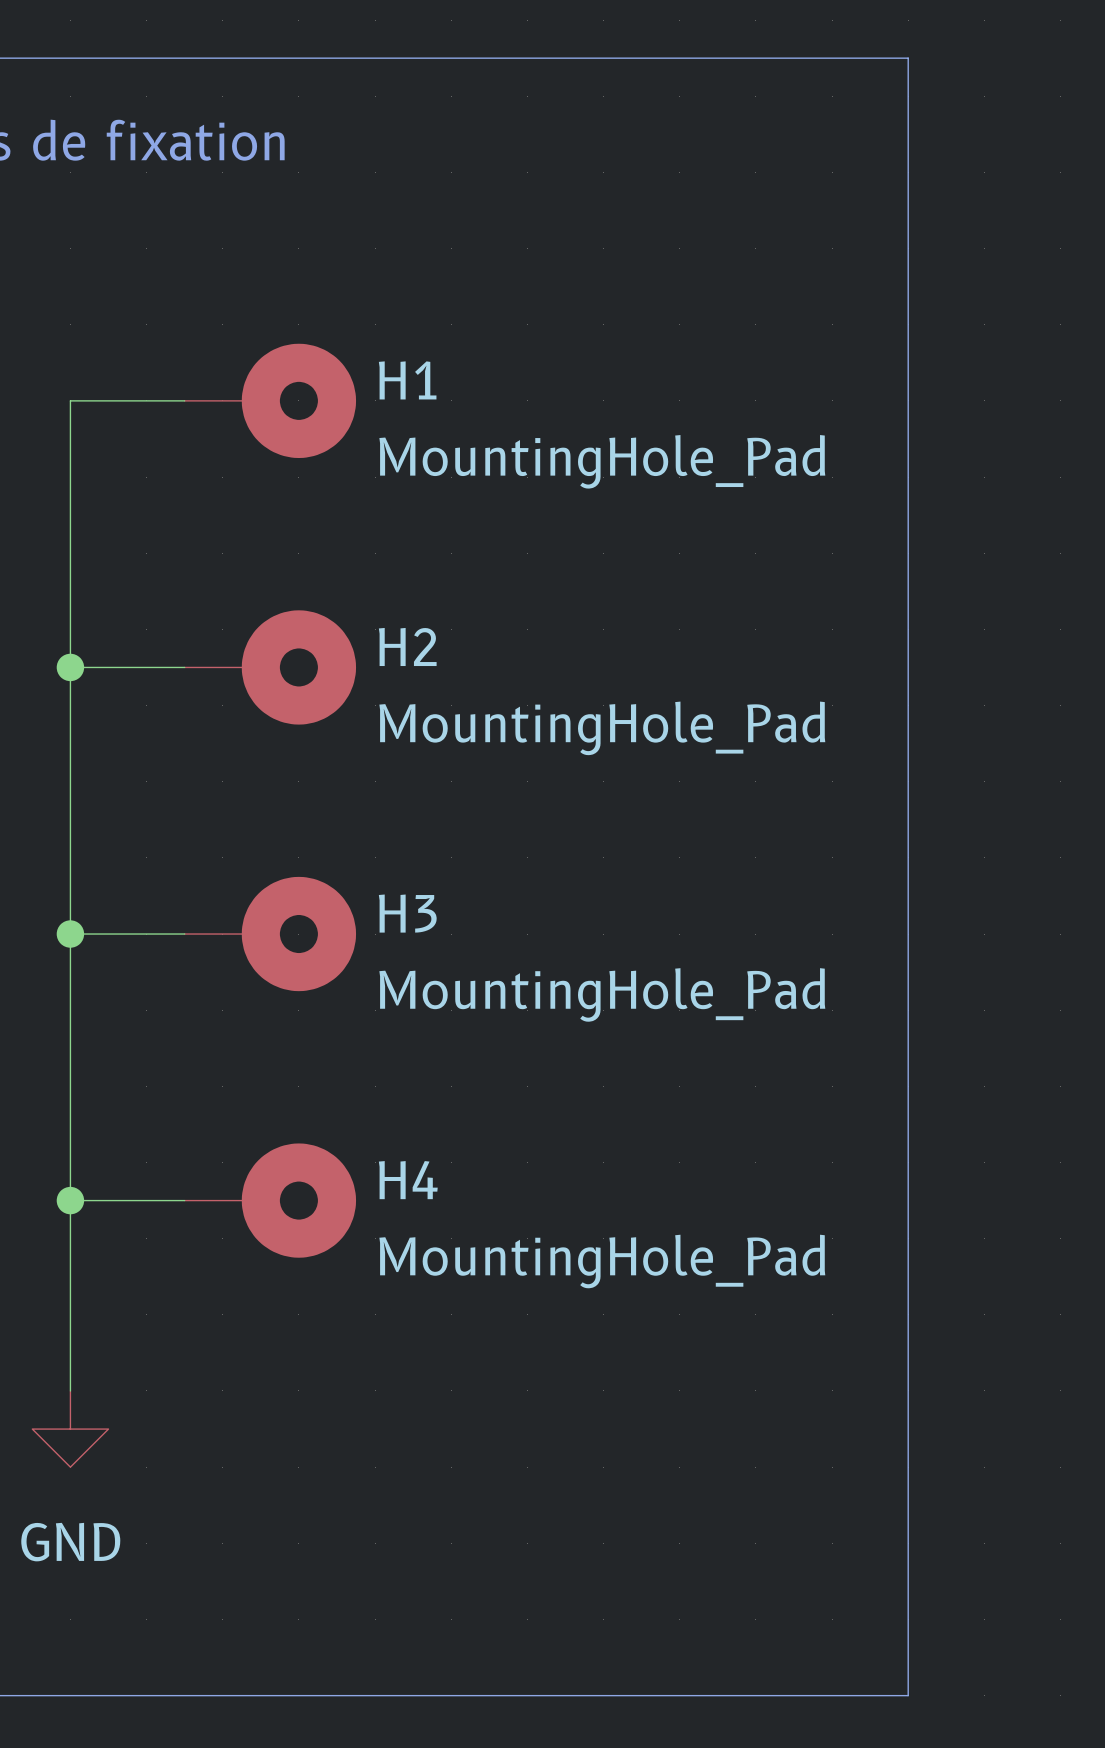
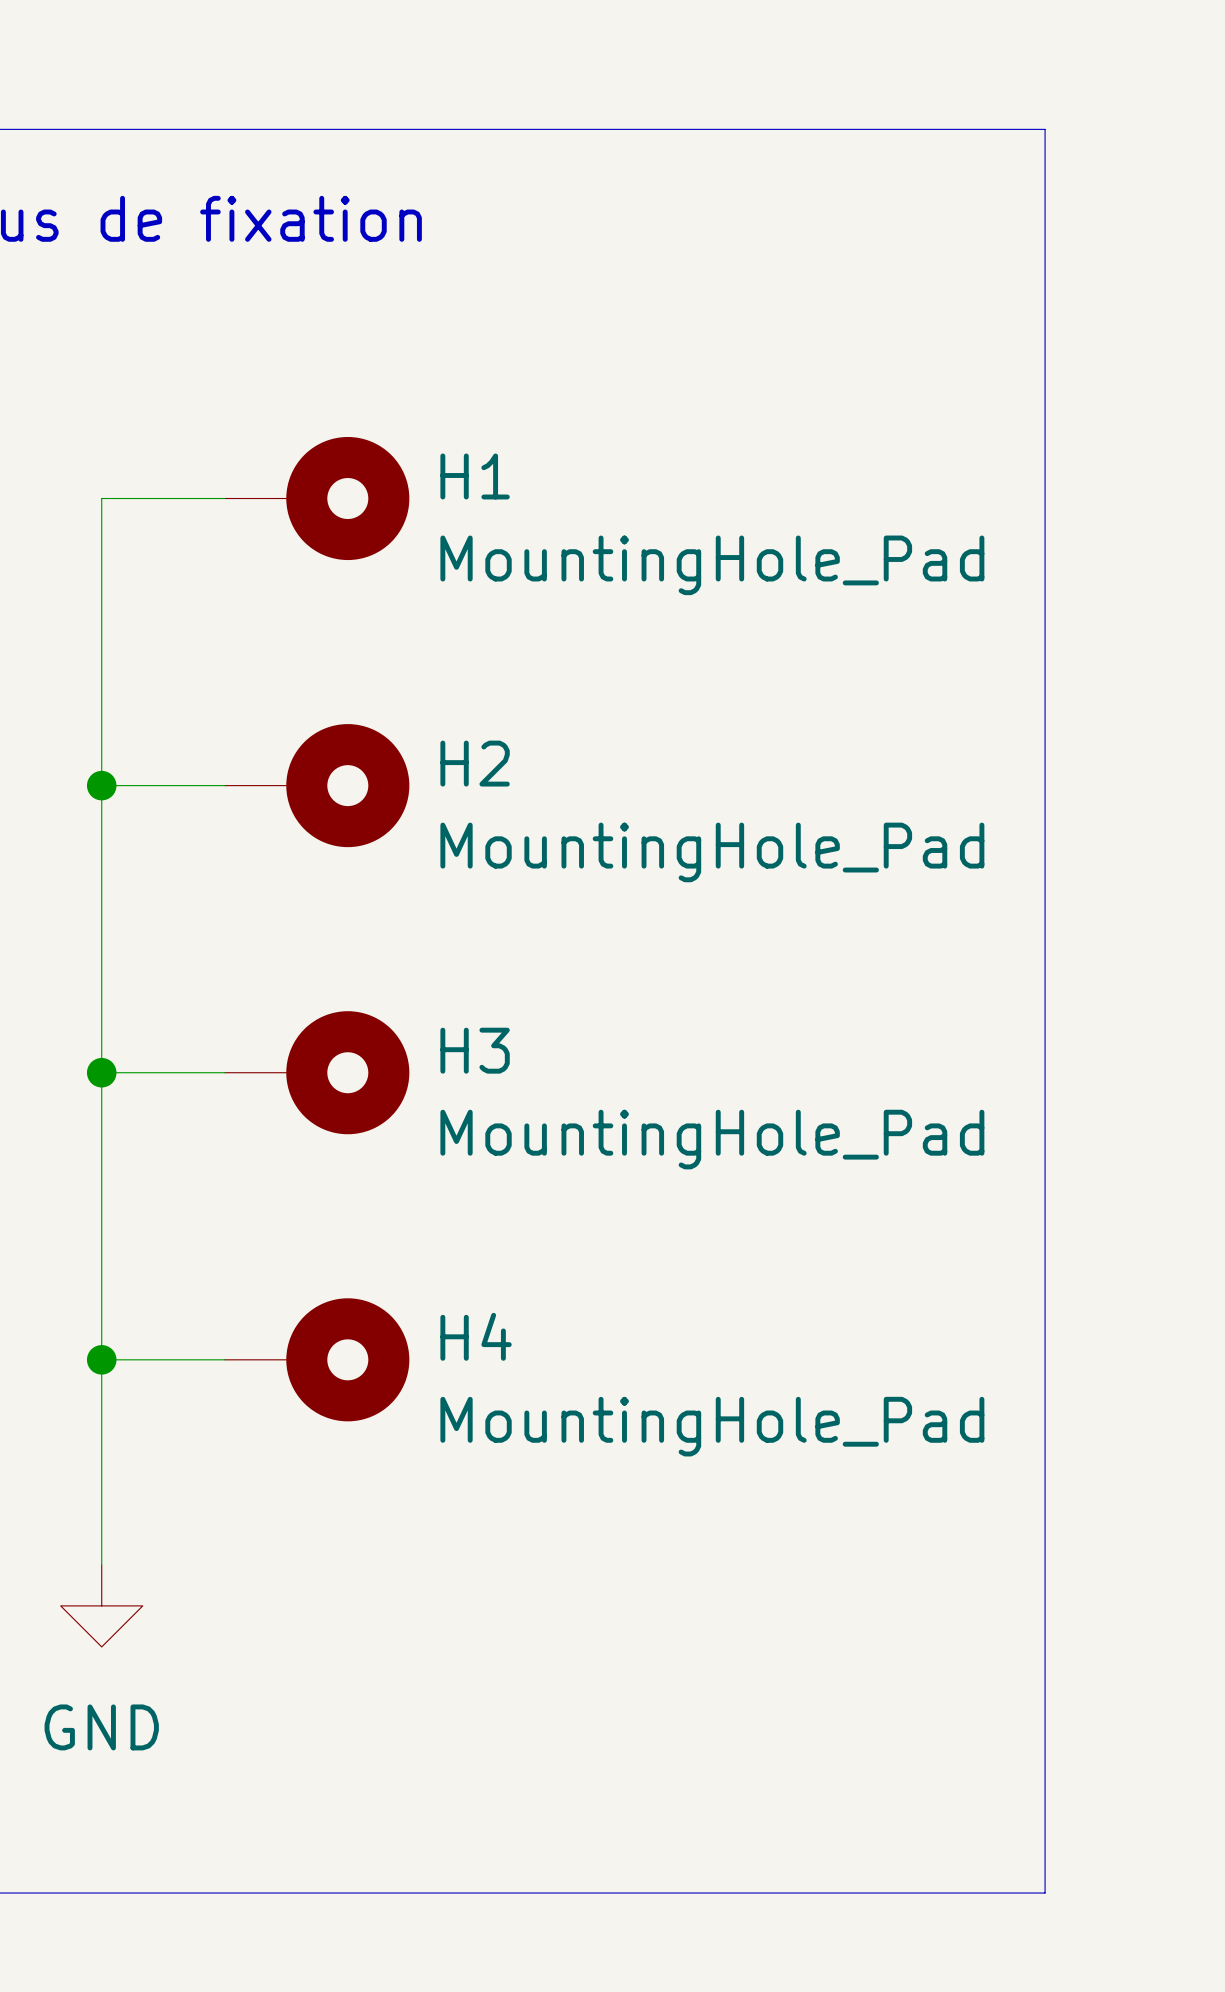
line: (908, 58) (908, 1695) -> (1004, 129) (1045, 129) (1045, 1893) (1004, 1893)

